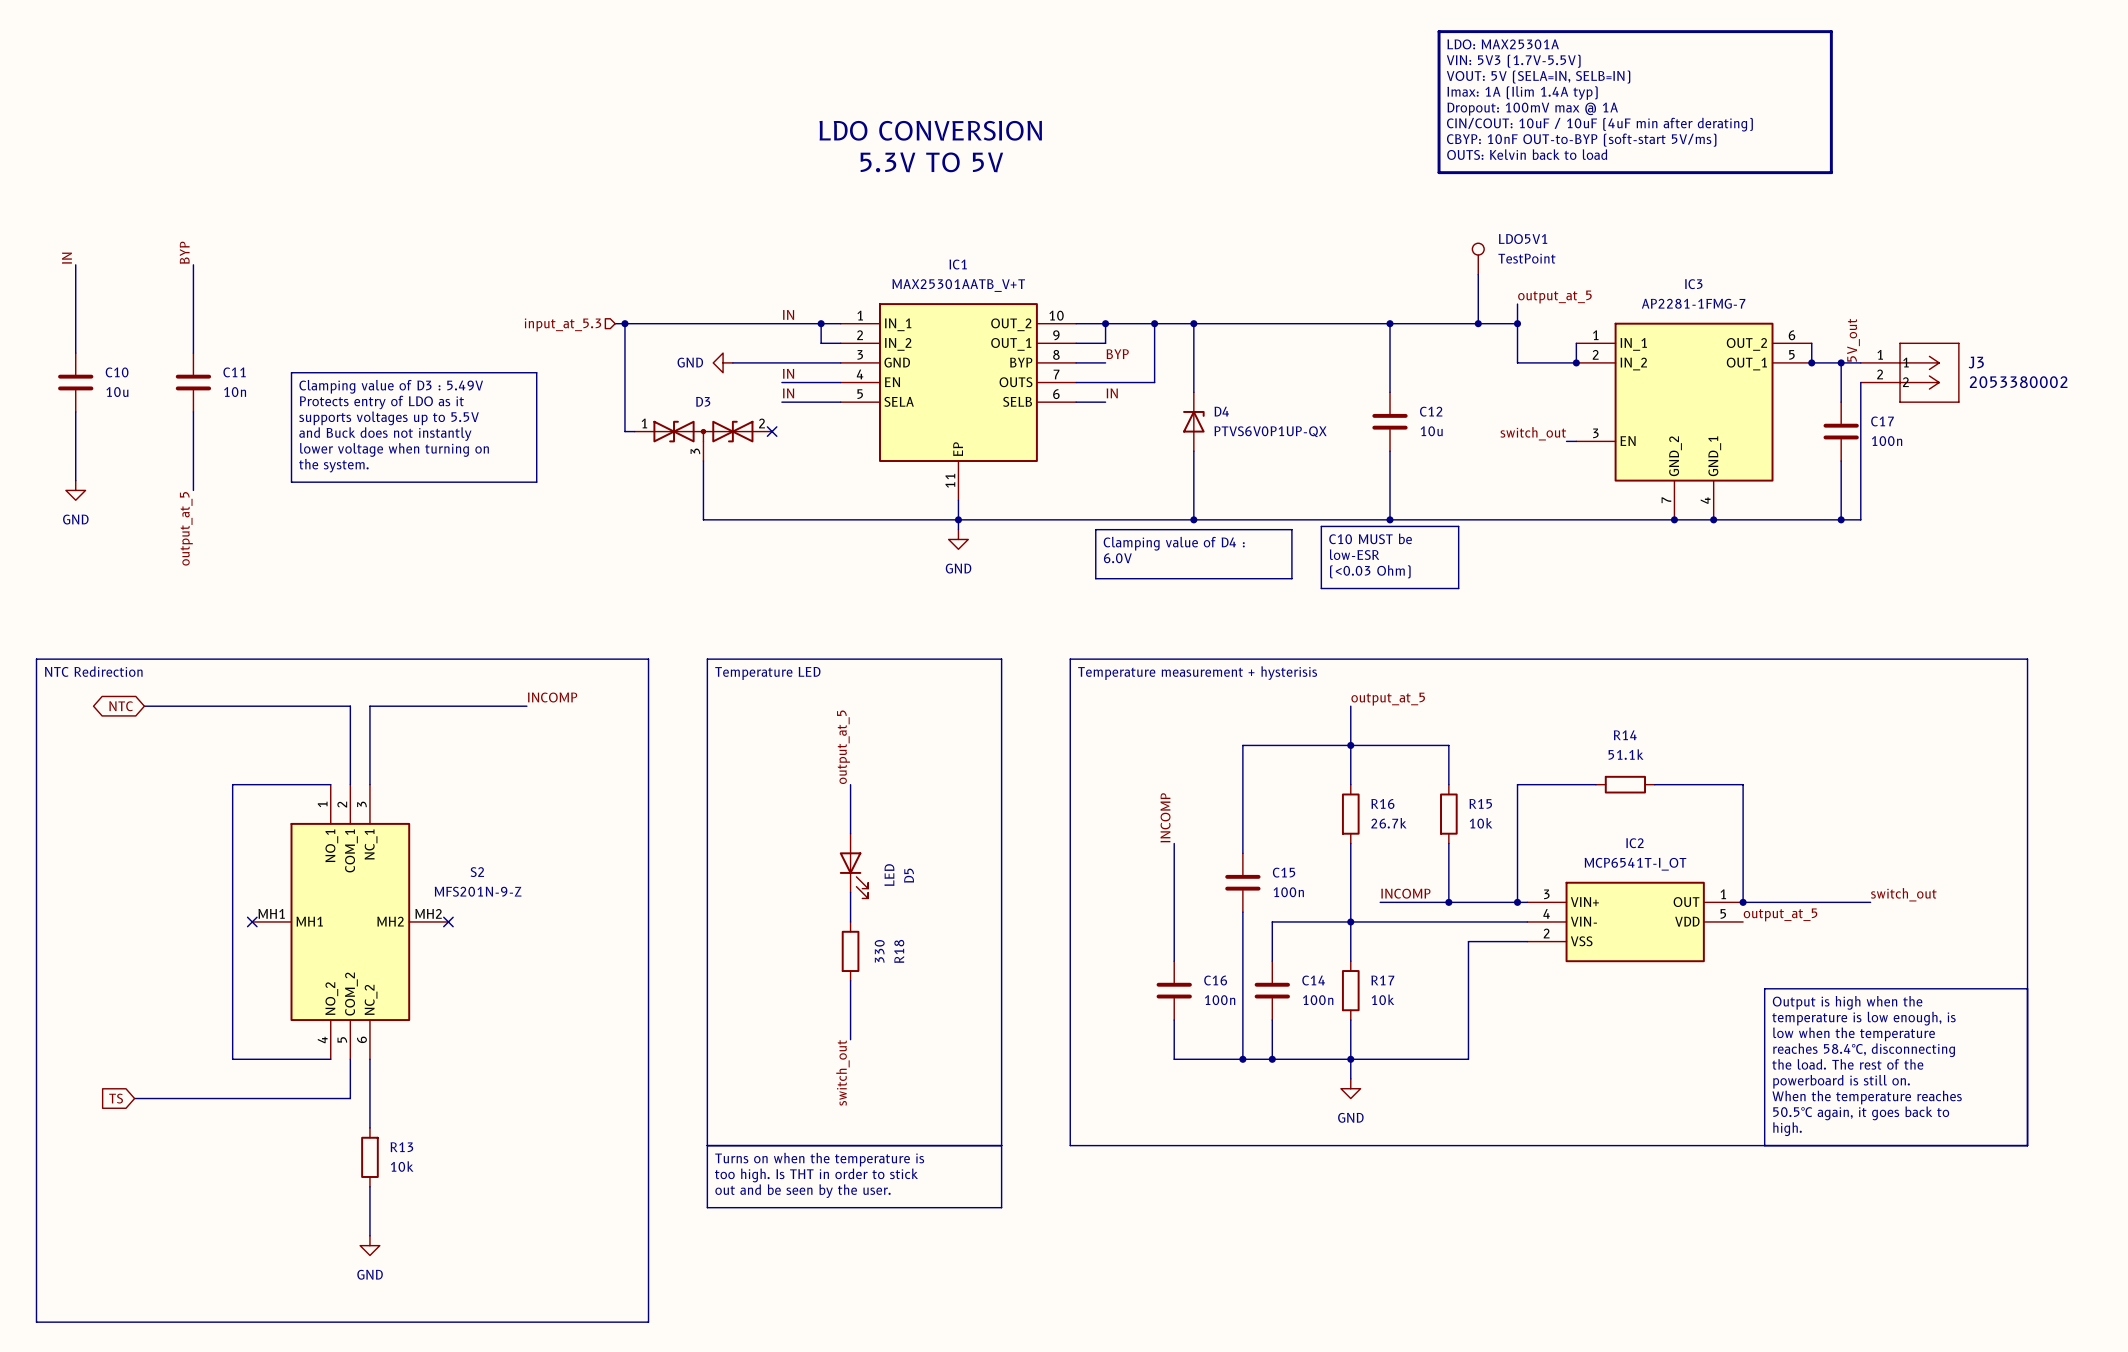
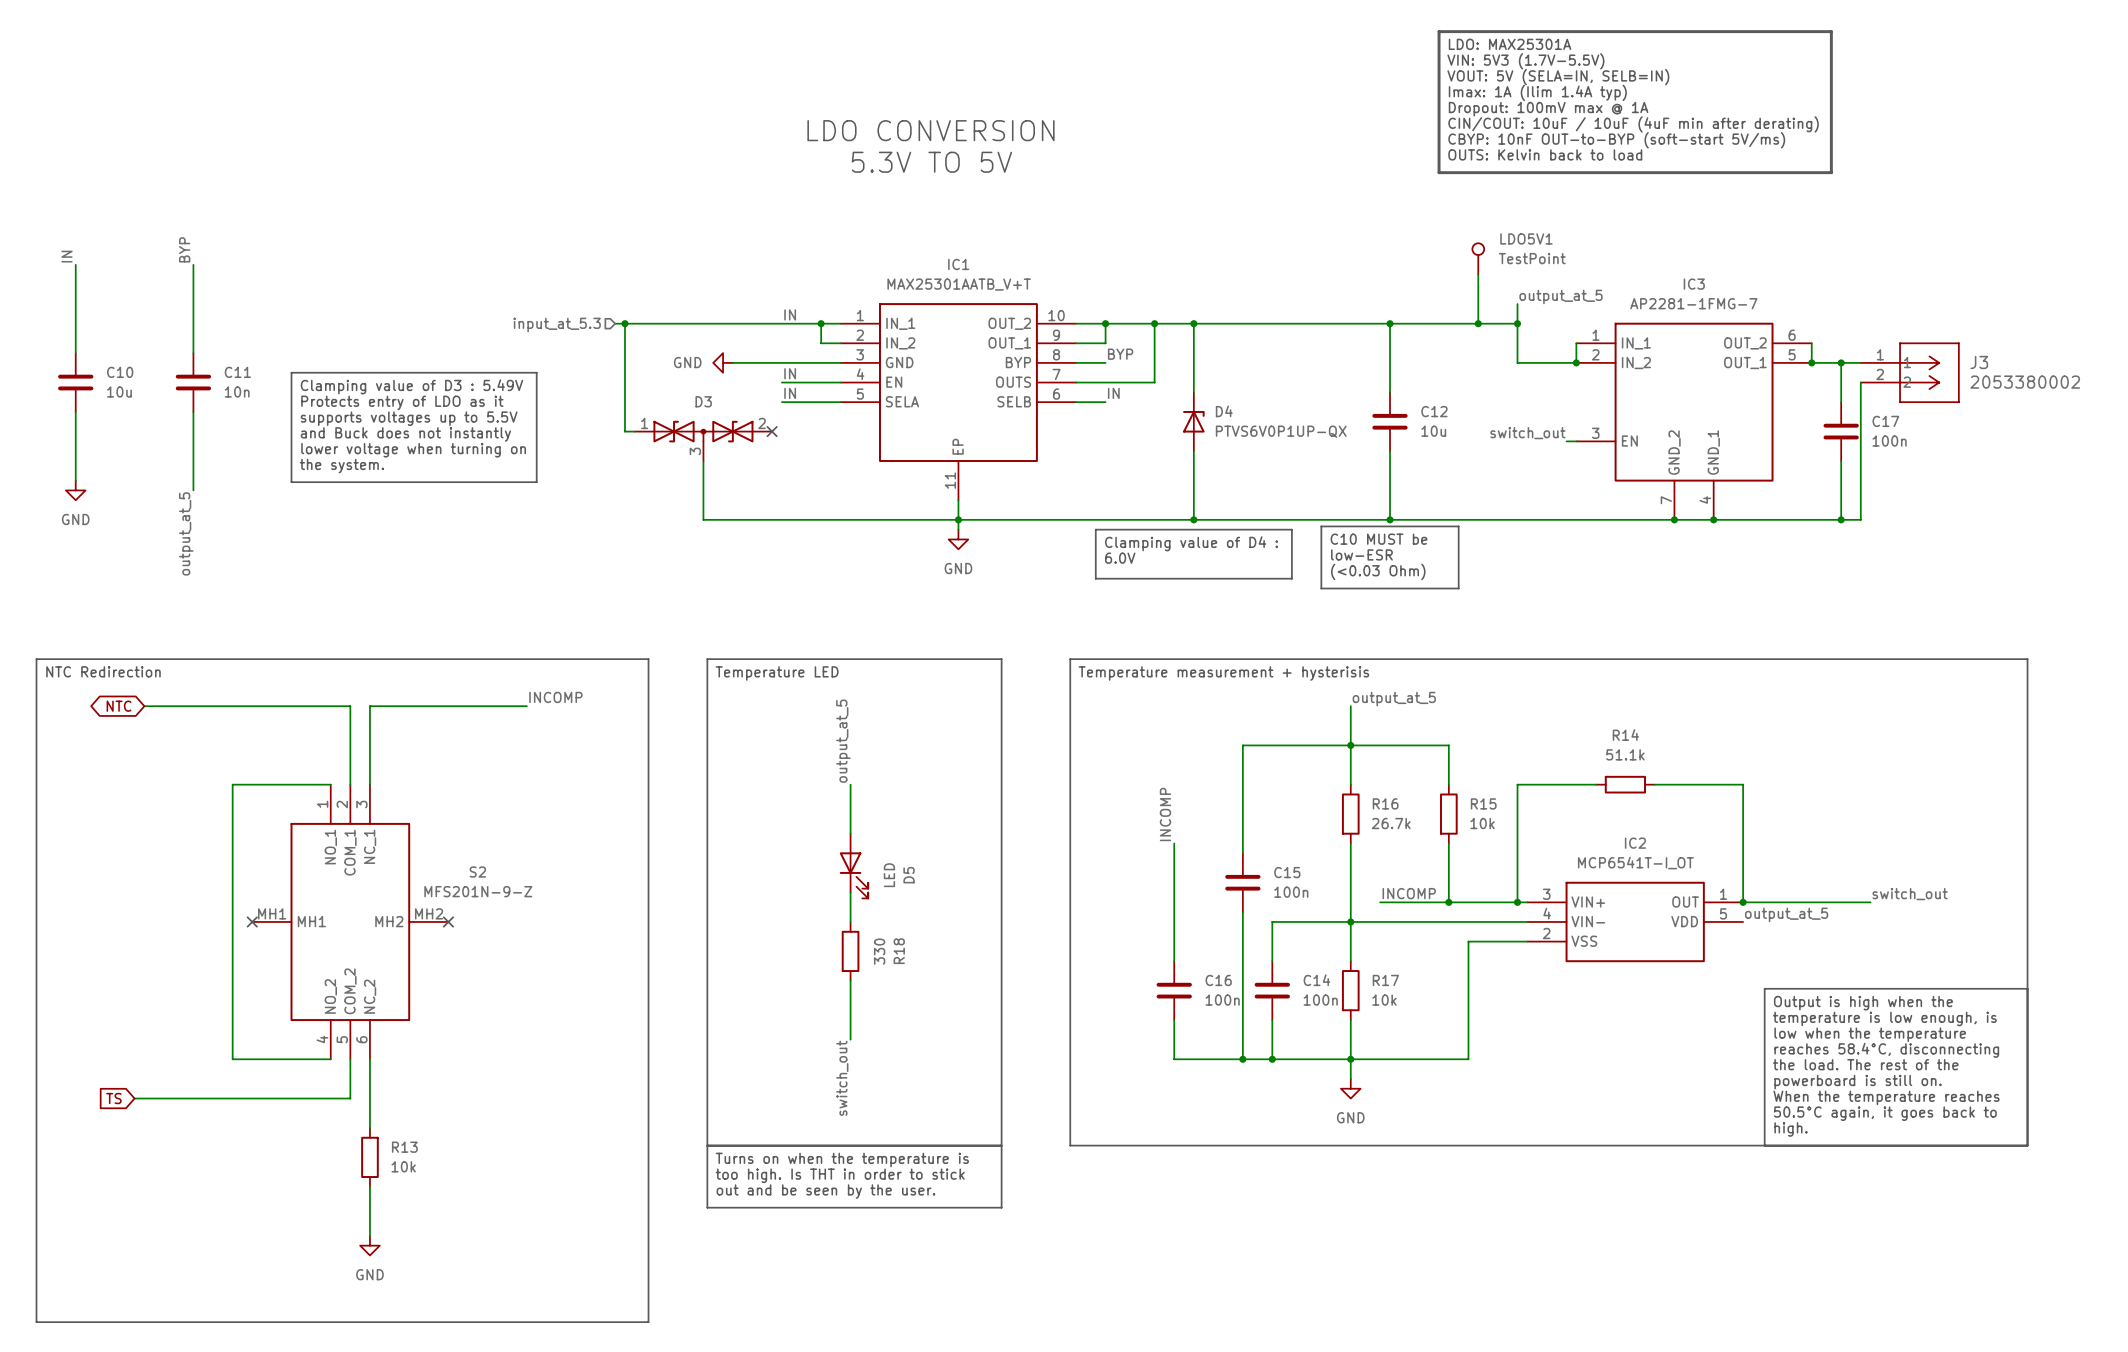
label: 5V_out (1853, 340) -> none

